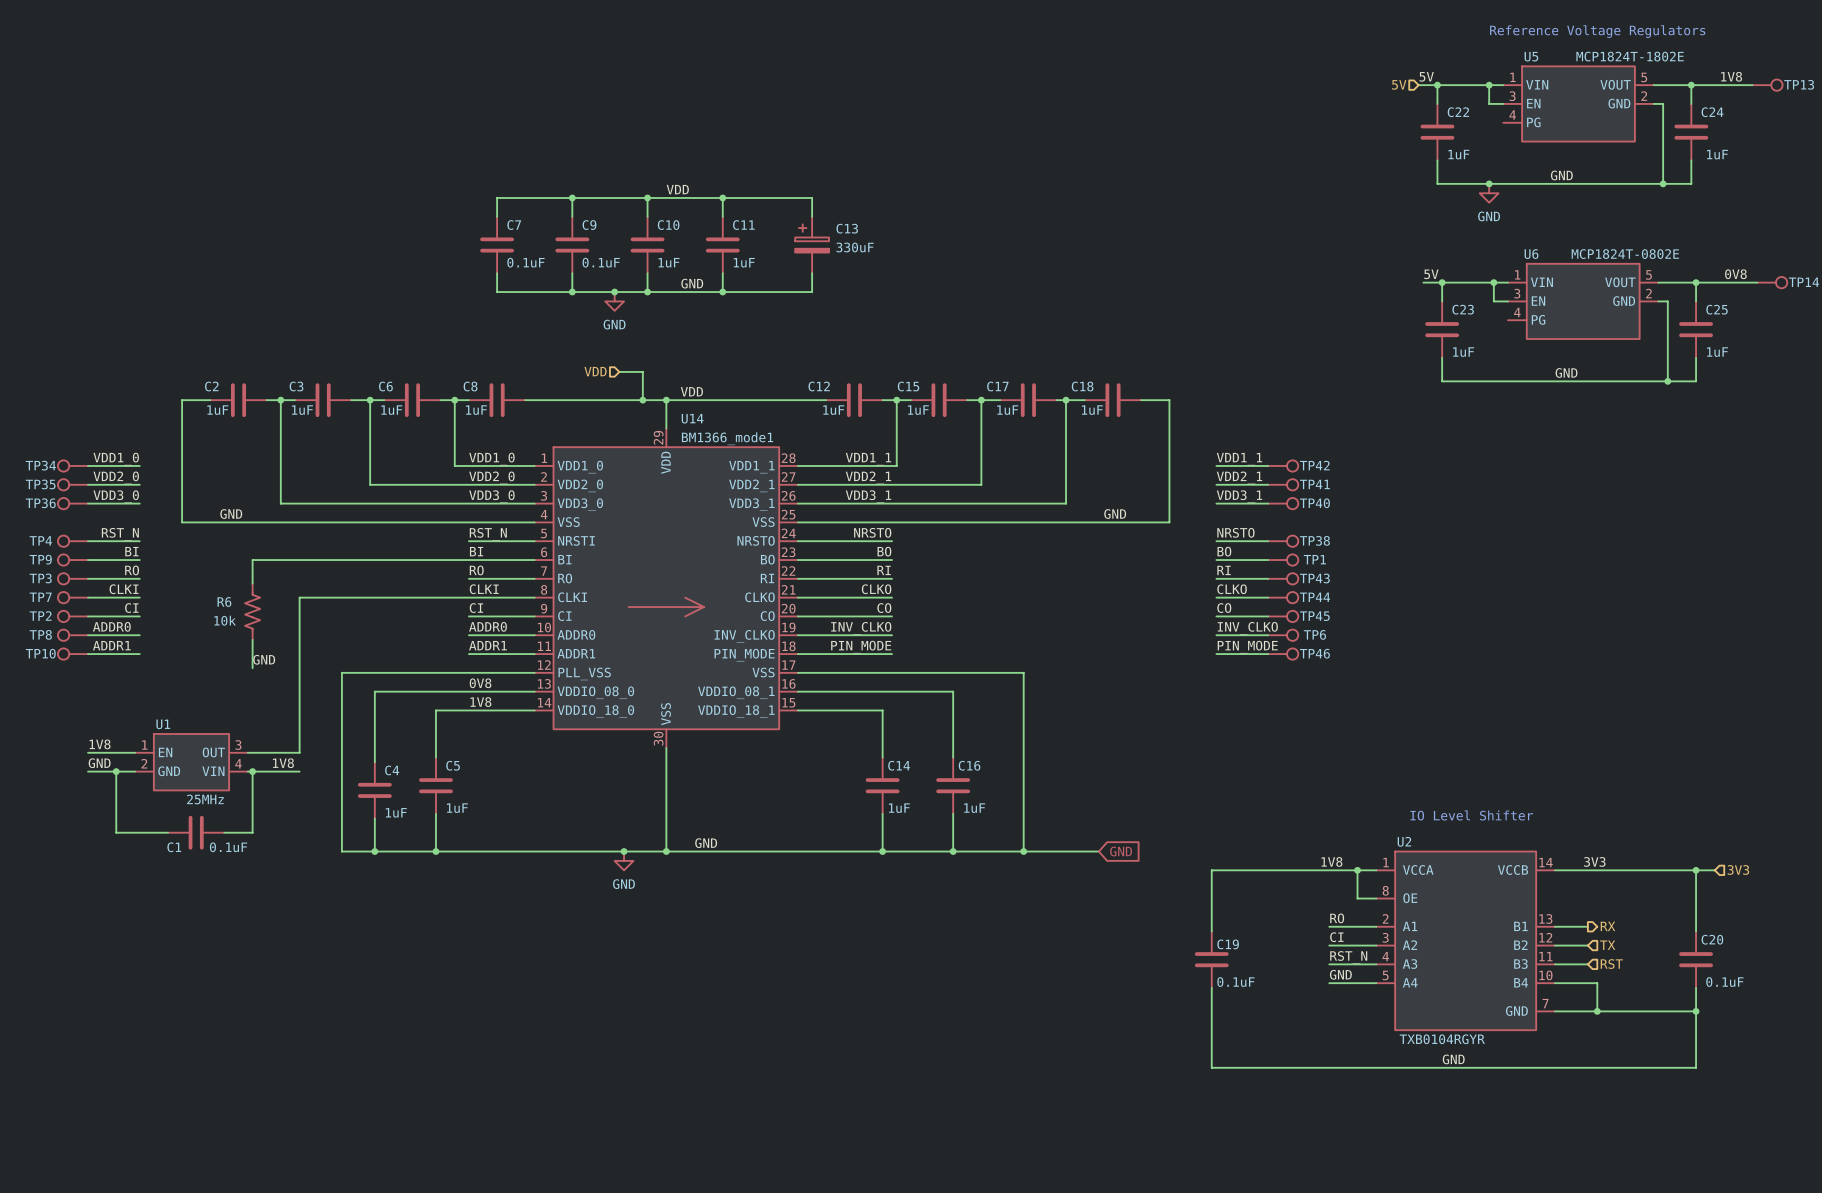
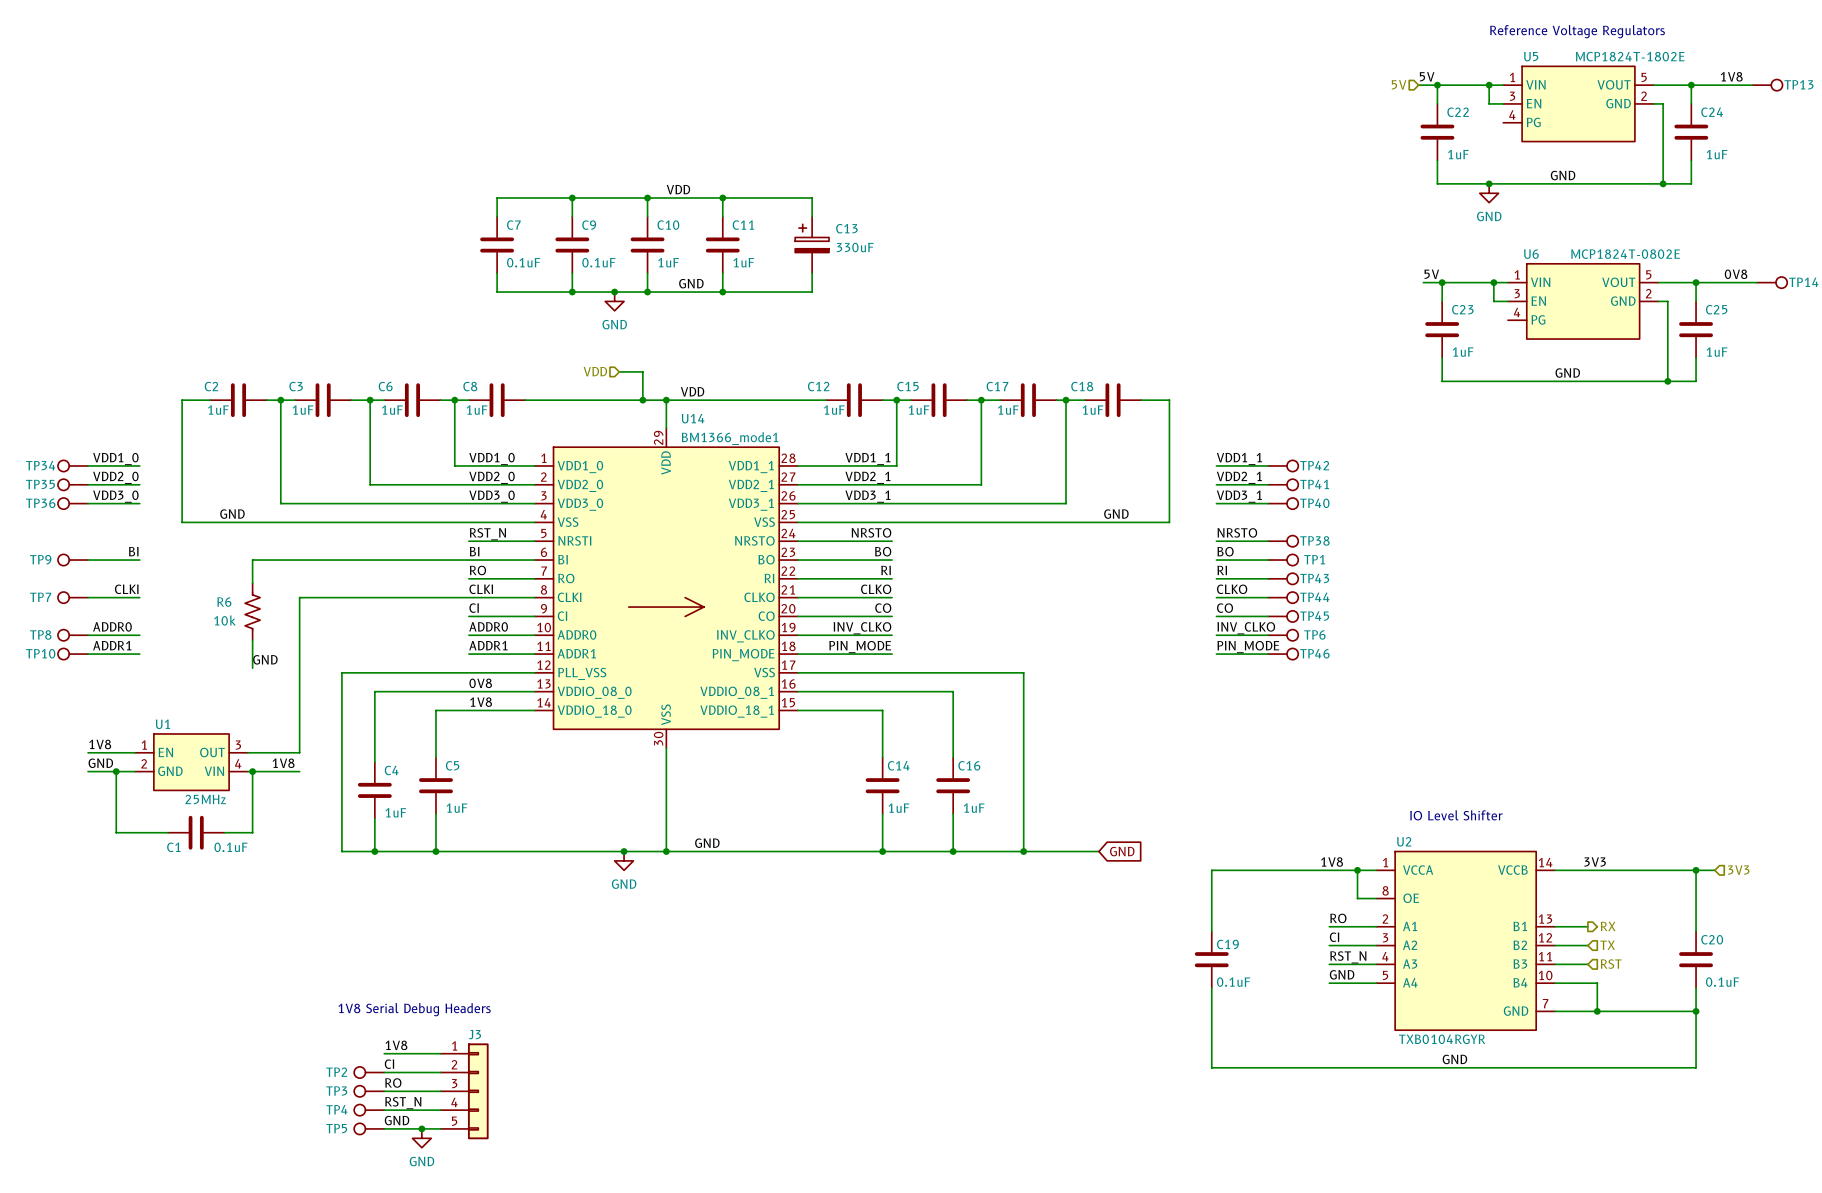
label: RST_N (120, 534) -> none
TP4 position: (73, 541) -> (369, 1110)
wire: (88, 541) (139, 541) -> none
label: RO (132, 570) -> none
TP3 position: (73, 578) -> (369, 1091)
wire: (88, 578) (139, 578) -> none
label: CI (131, 608) -> none
TP2 position: (73, 616) -> (369, 1072)
wire: (88, 616) (139, 616) -> none
text: none -> 1V8 Serial Debug Headers (414, 1009)
label: none -> 1V8 (396, 1045)
wire: none -> (384, 1053) (440, 1053)
label: none -> CI (389, 1064)
wire: none -> (384, 1072) (440, 1072)
label: none -> RO (393, 1082)
wire: none -> (384, 1091) (440, 1091)
J3: none -> (464, 1091)
label: none -> RST_N (403, 1103)
wire: none -> (384, 1110) (440, 1110)
label: none -> GND (397, 1120)
TP5: none -> (369, 1128)
wire: none -> (384, 1128) (440, 1128)
junction: none -> (421, 1128)
power symbol: none -> GND (421, 1138)

